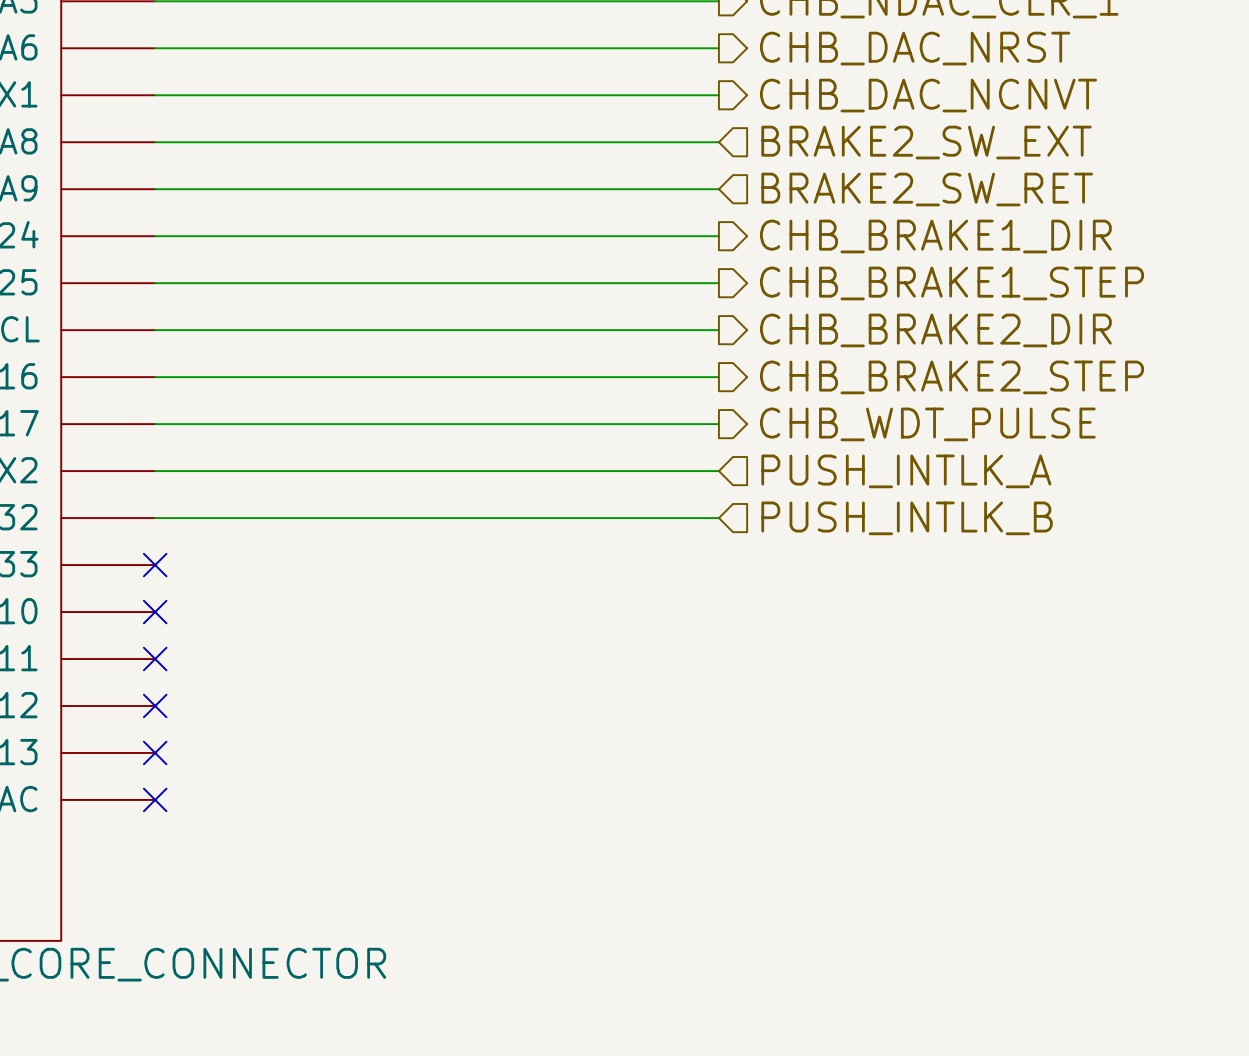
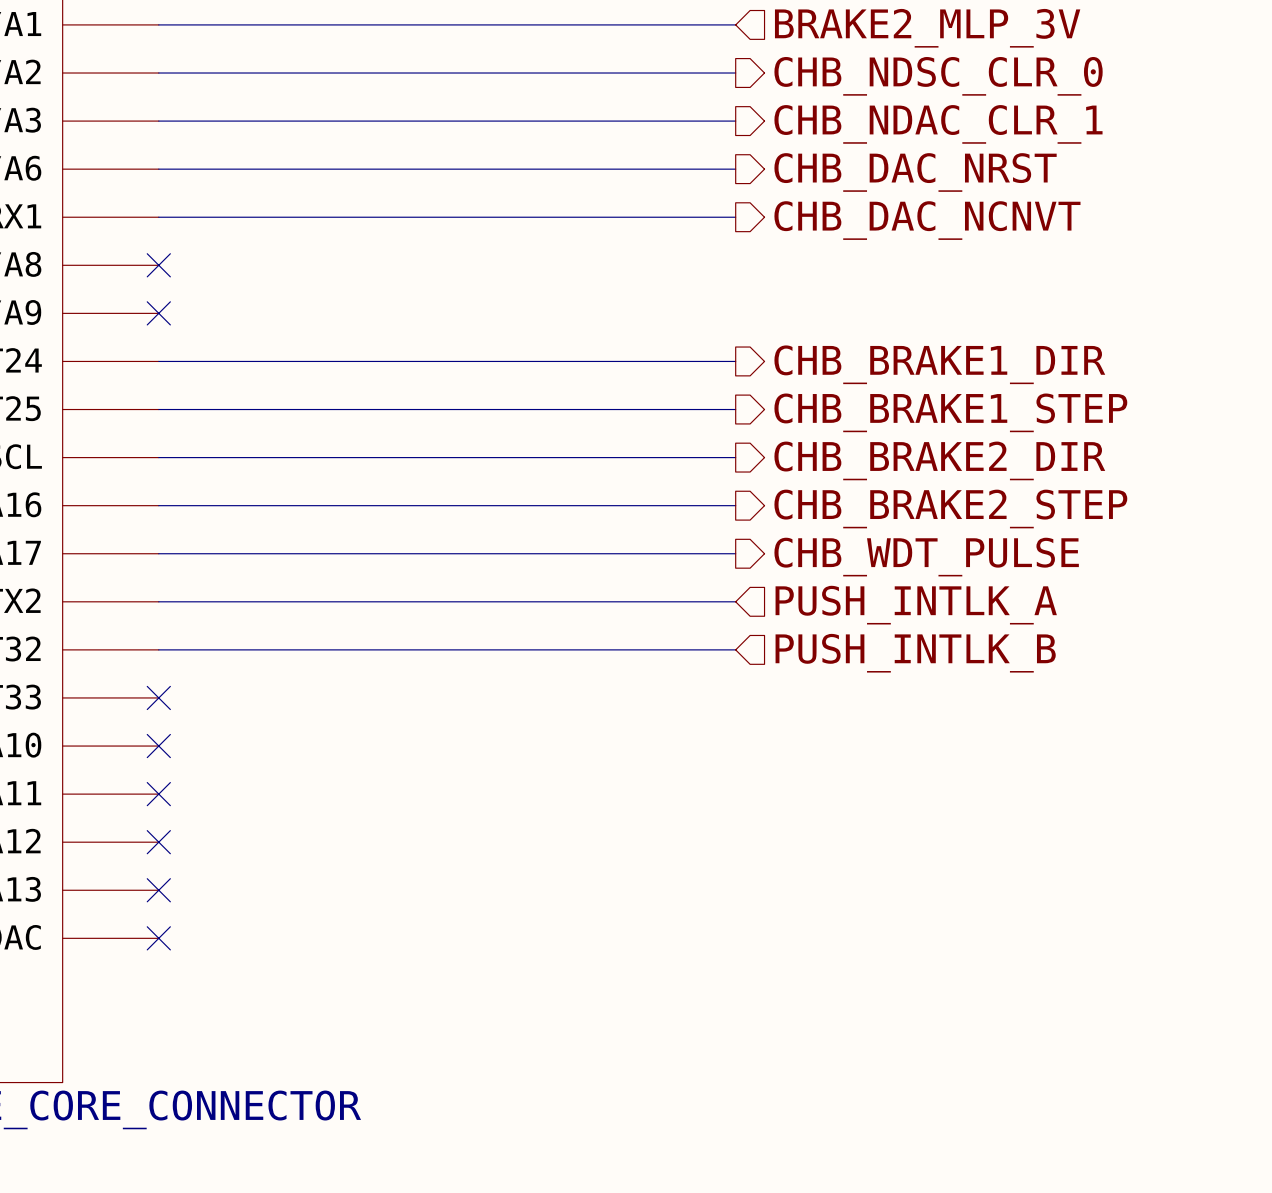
wire: (155, 142) (718, 142) -> none
no-connect mark: none -> (158, 265)
hierarchical label: BRAKE2_SW_EXT (926, 142) -> none
wire: (155, 189) (718, 189) -> none
no-connect mark: none -> (158, 313)
hierarchical label: BRAKE2_SW_RET (927, 189) -> none

